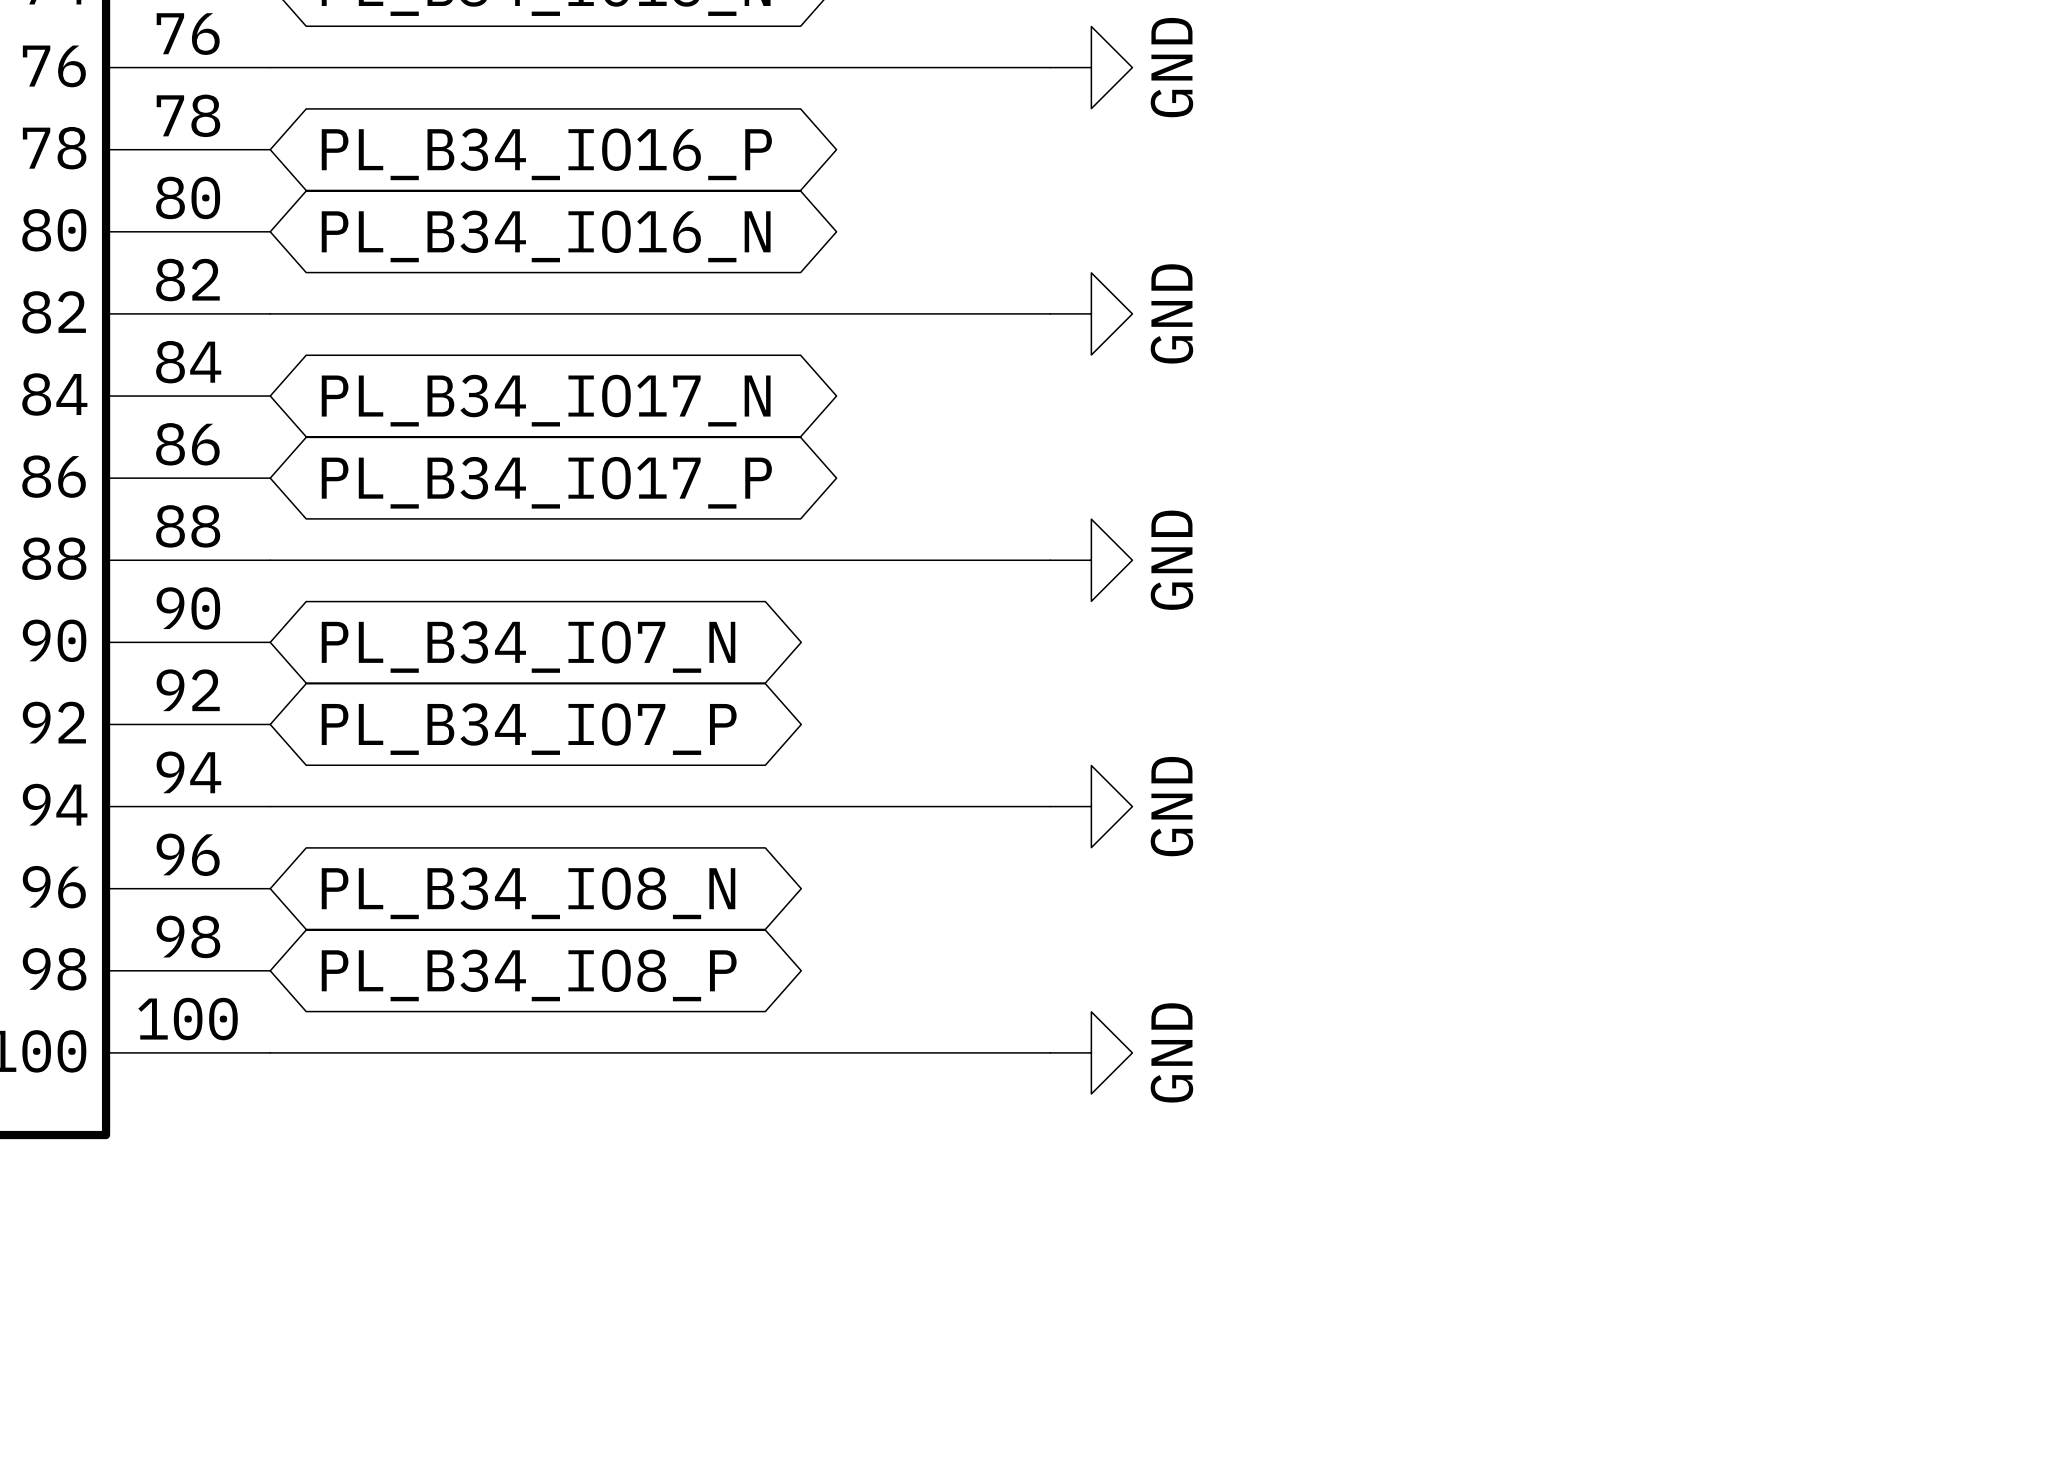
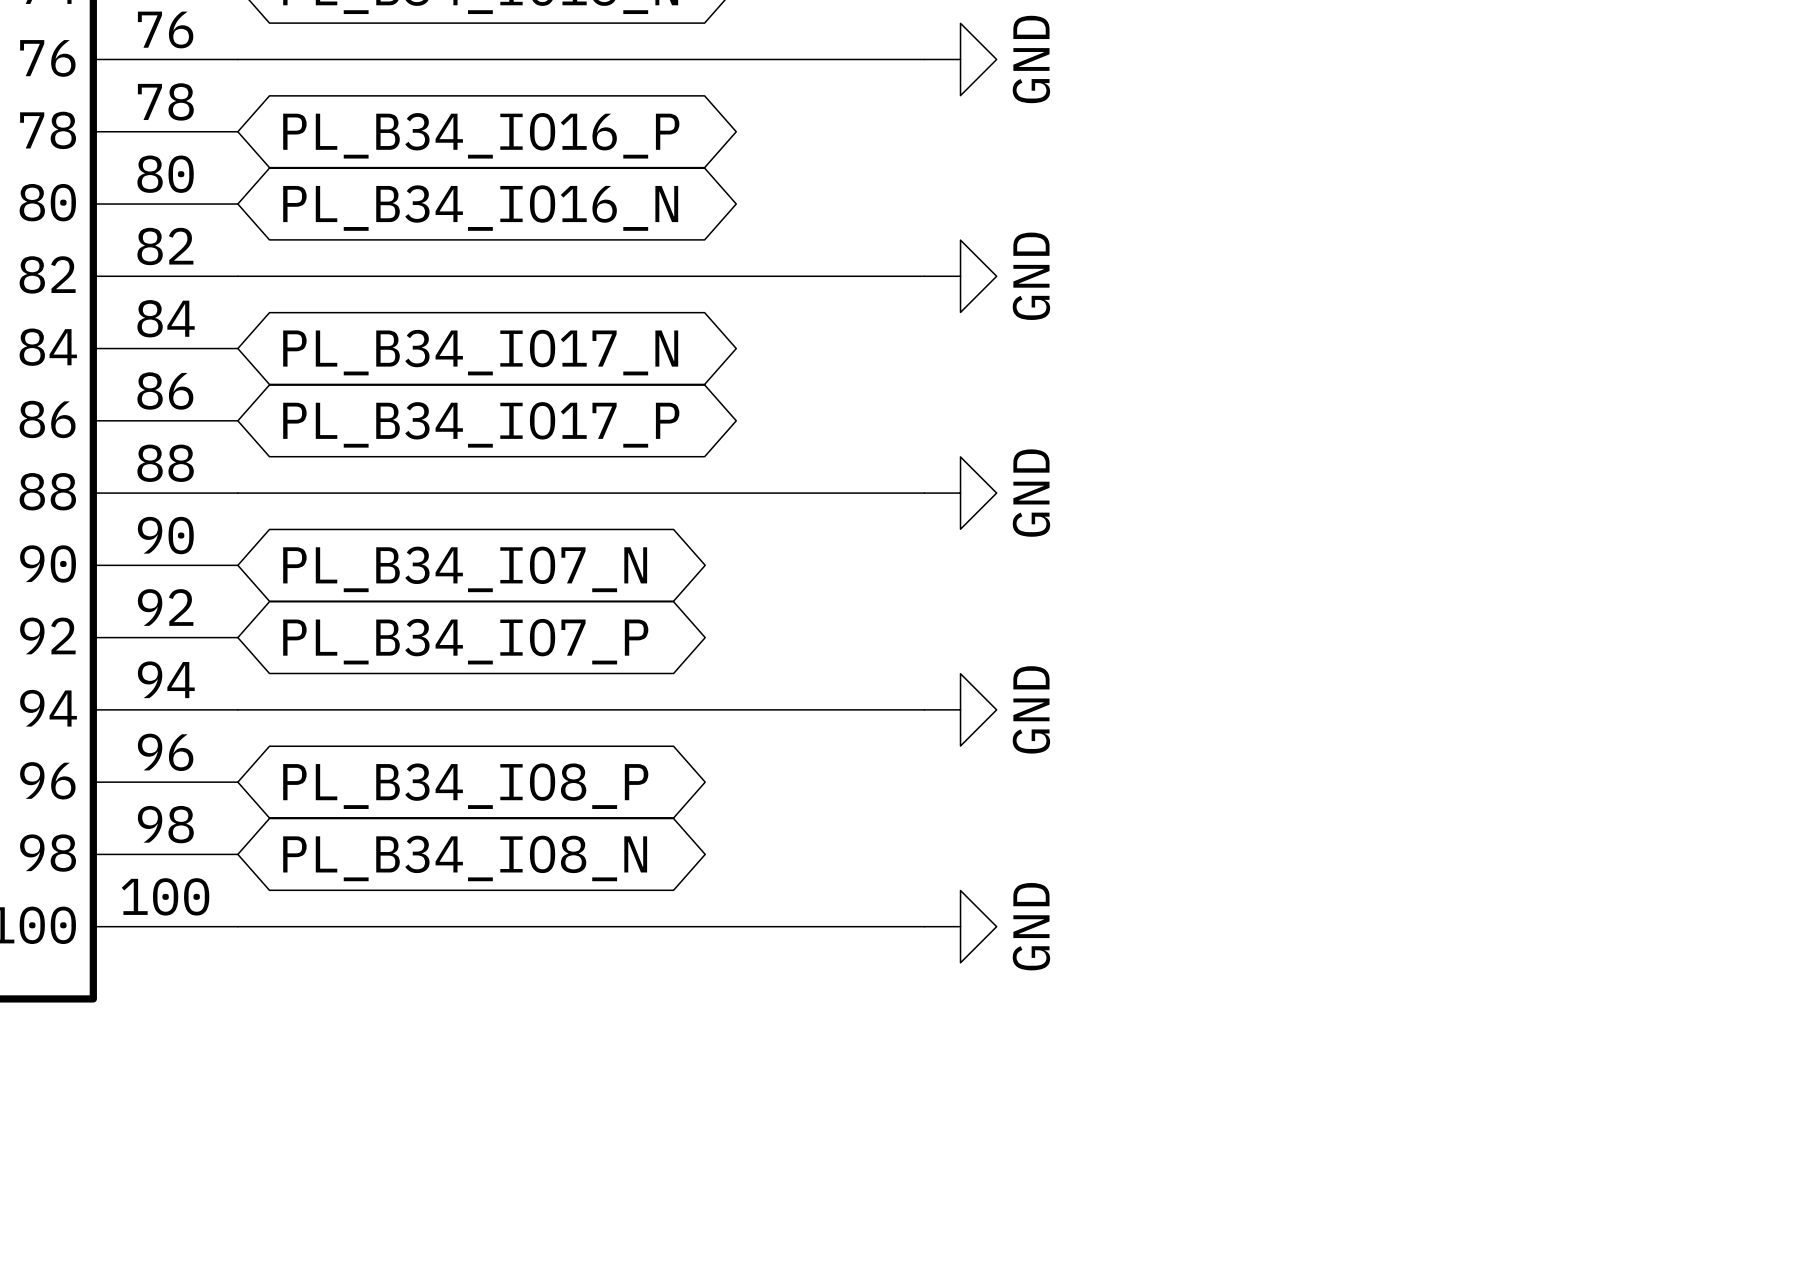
global label: PL_B34_IO8_N (528, 893) -> PL_B34_IO8_P (465, 786)
global label: PL_B34_IO8_P (529, 975) -> PL_B34_IO8_N (465, 858)

